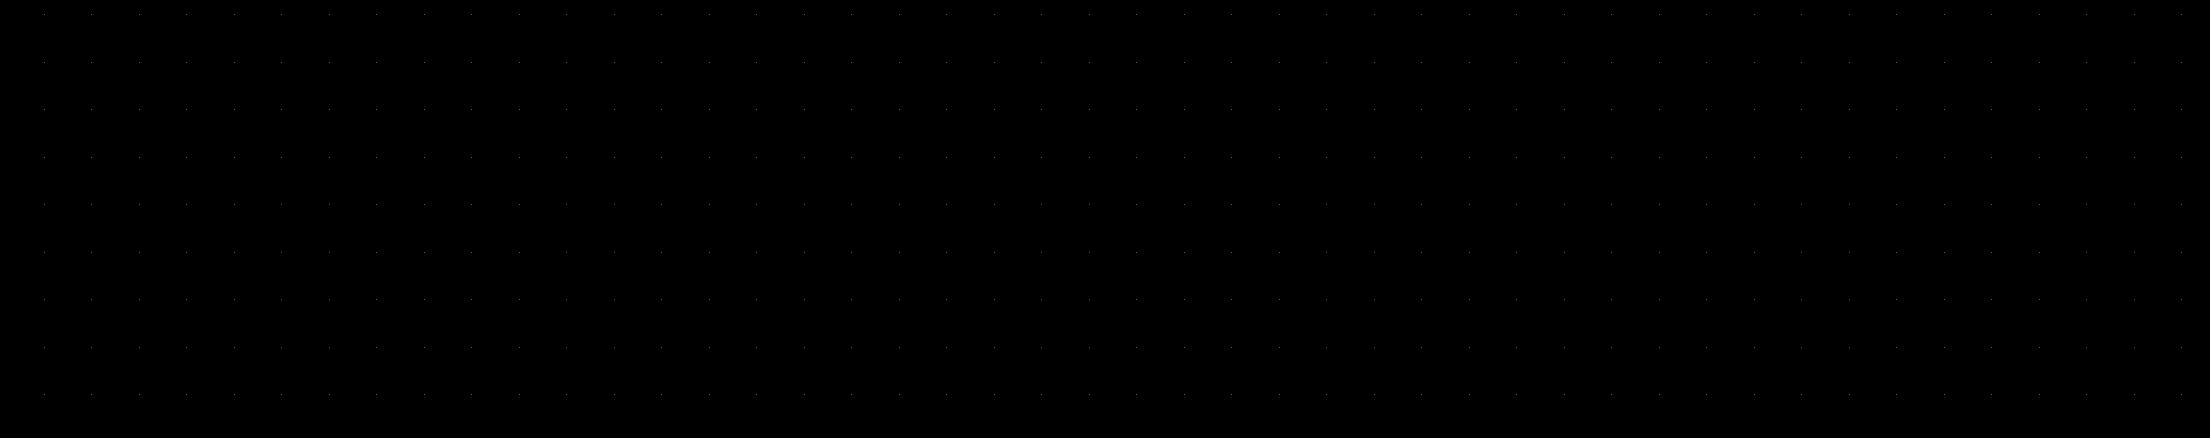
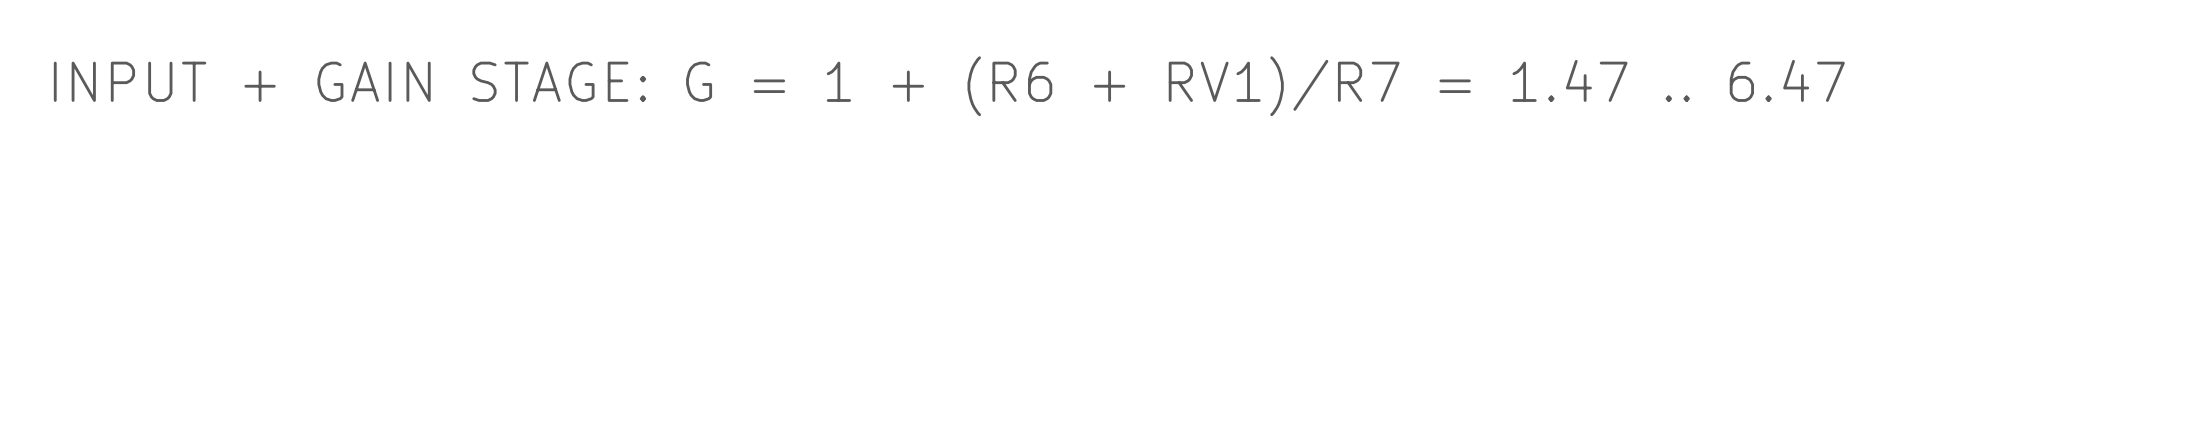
text: none -> INPUT + GAIN STAGE: G = 1 + (R6 + RV1)/R7 = 1.47 .. 6.47 (949, 86)

